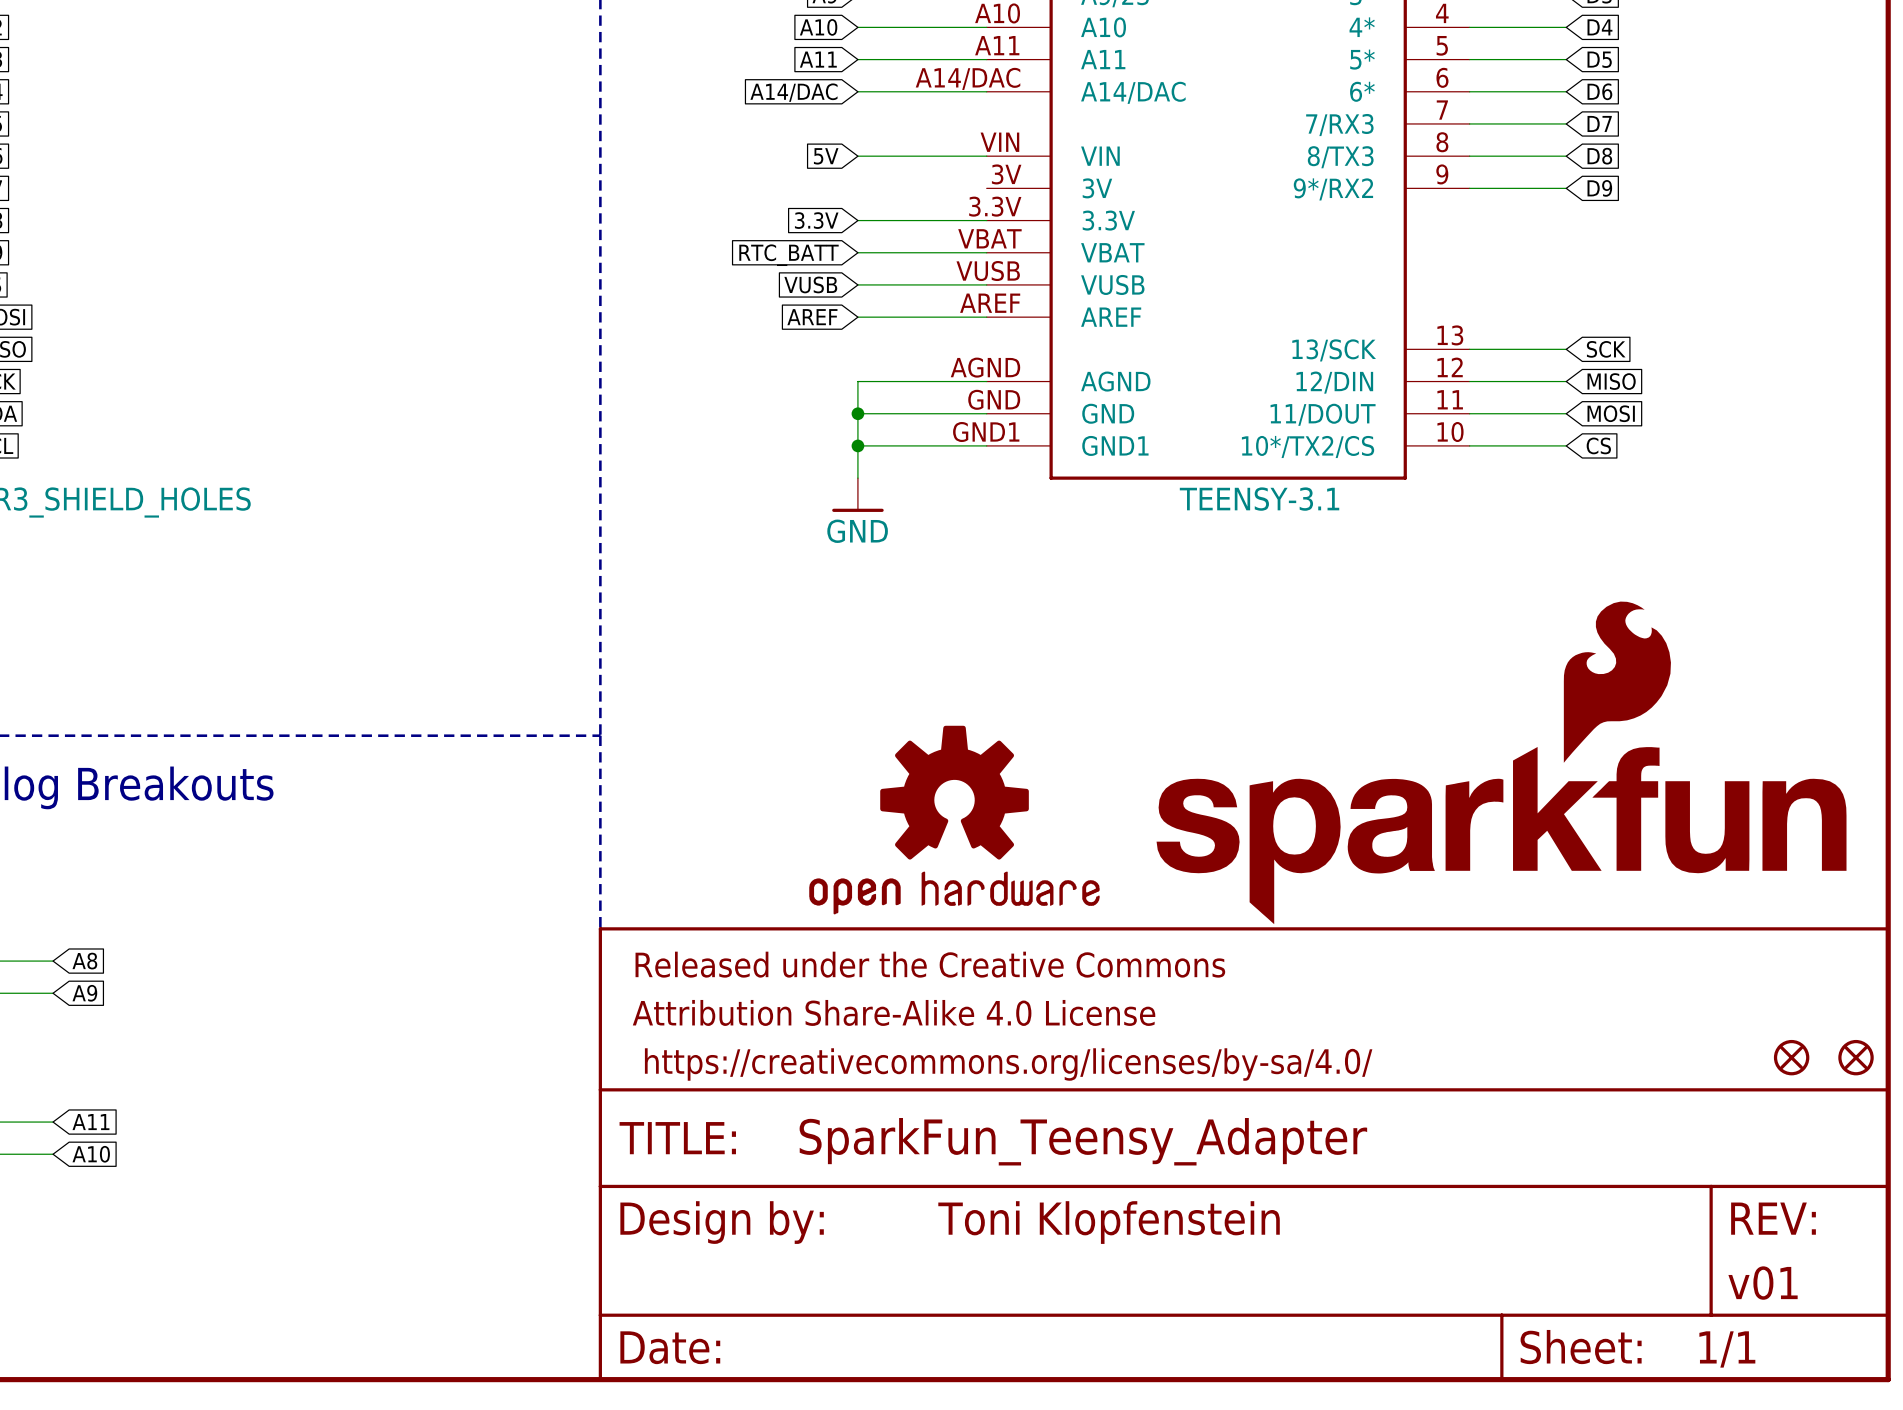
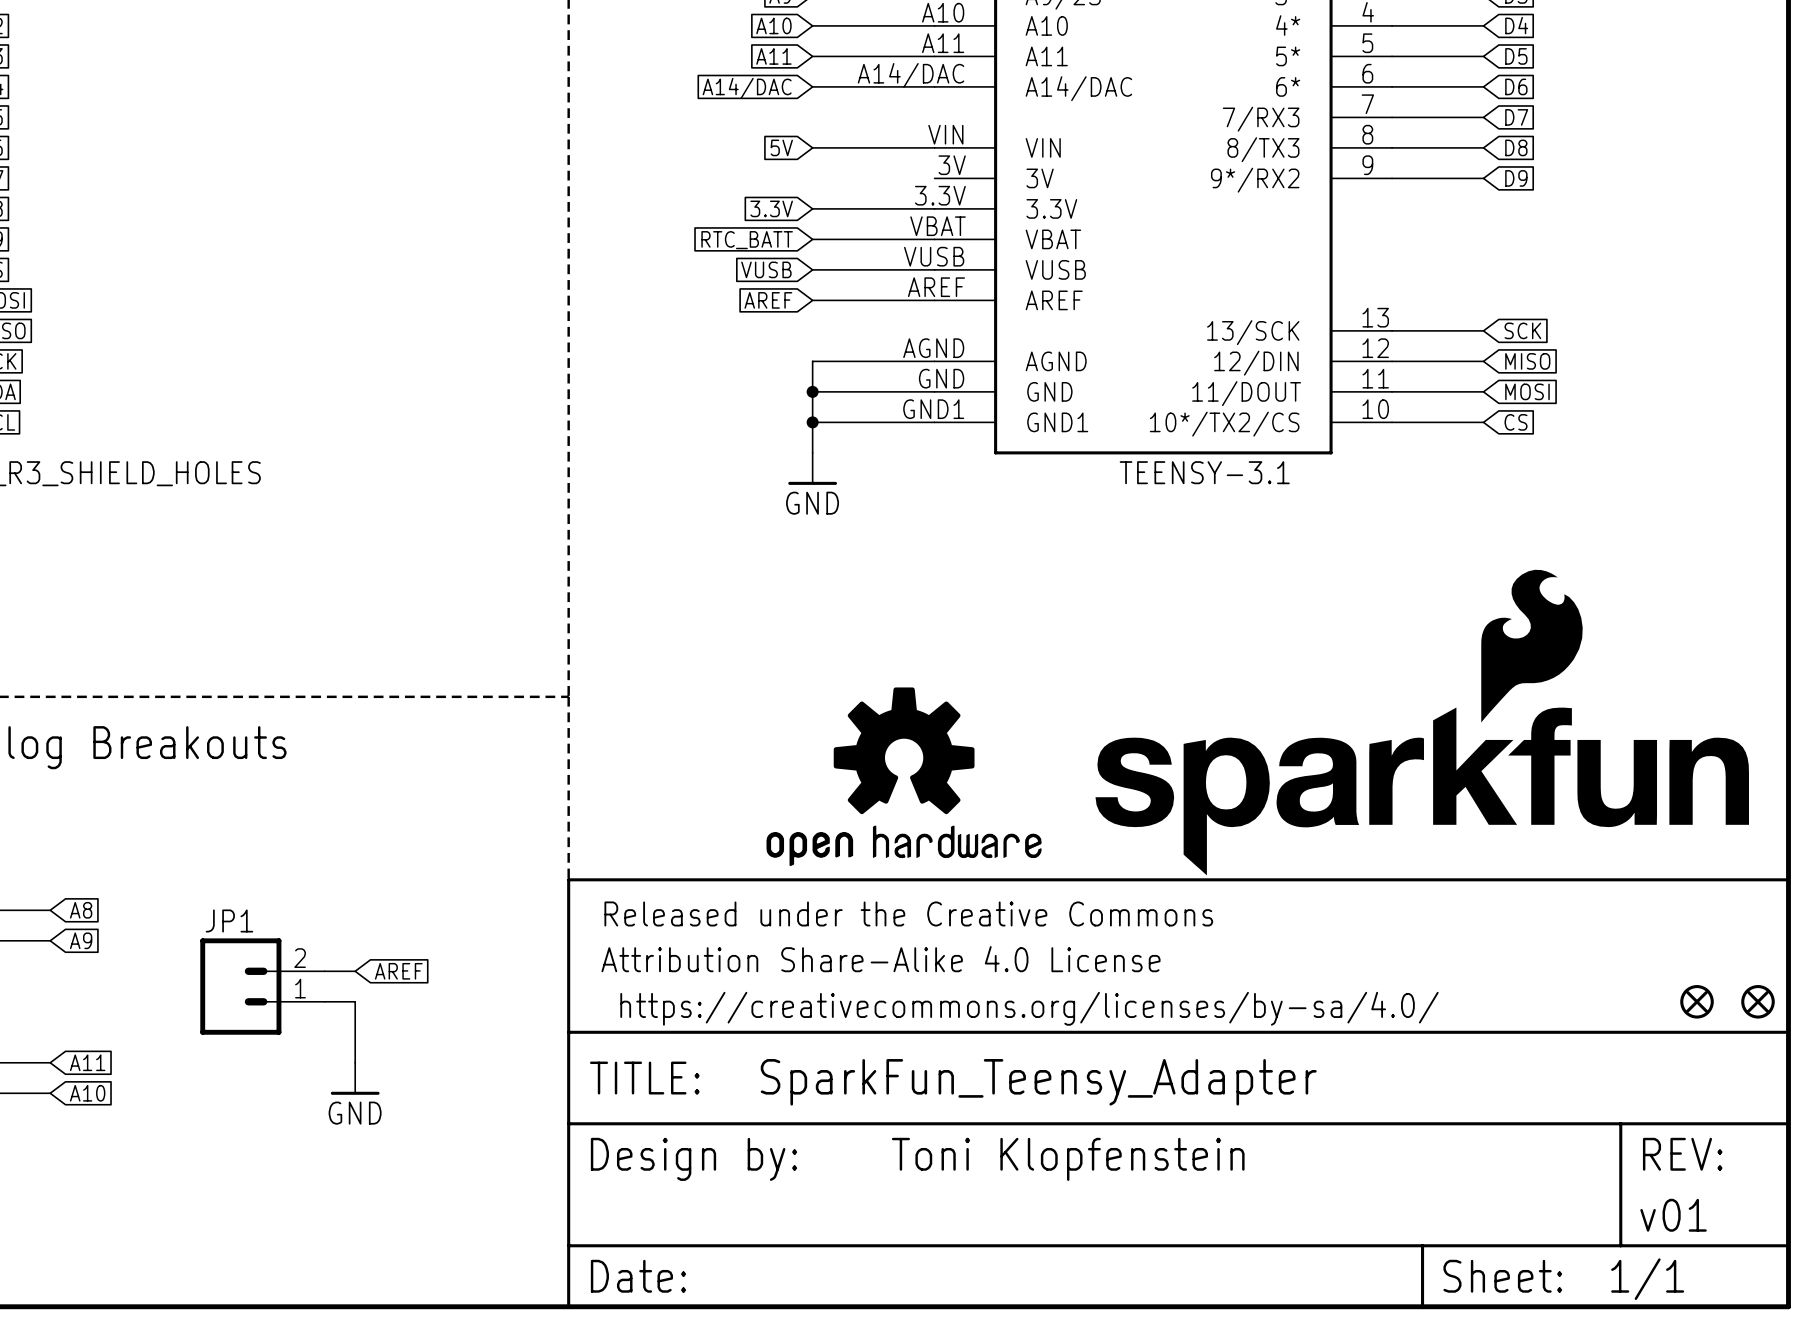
wire: none -> (324, 971) (355, 971)
global label: none -> AREF (398, 971)
JP1: none -> (262, 986)
wire: none -> (324, 1001) (355, 1001) (355, 1062)
power symbol: none -> GND (355, 1078)

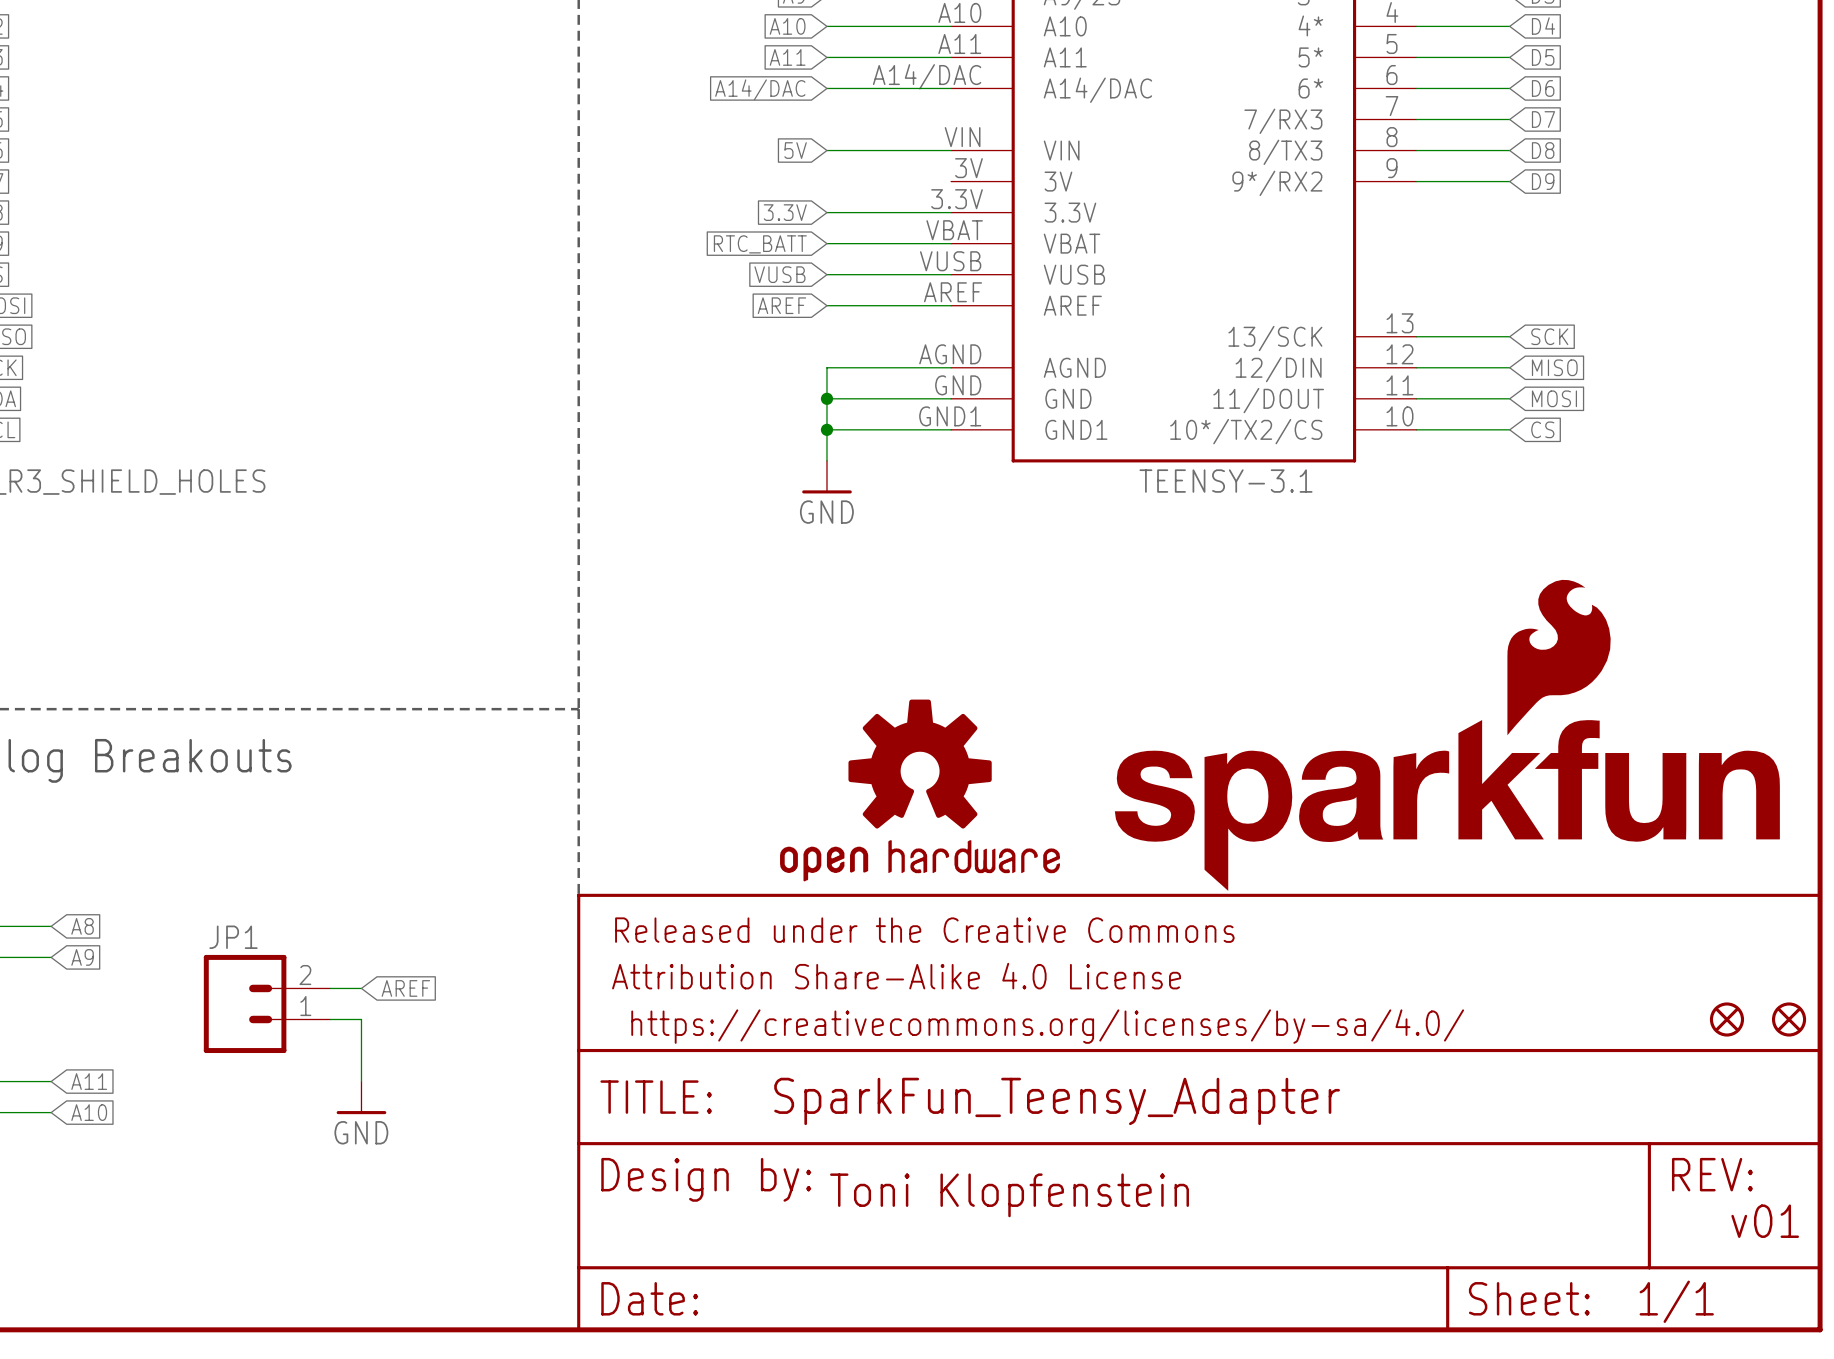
part text: Toni Klopfenstein (1068, 1159) -> none
text: none -> Toni Klopfenstein (1009, 1195)
text: none -> v01 (1765, 1221)
part text: v01 (1673, 1215) -> none

